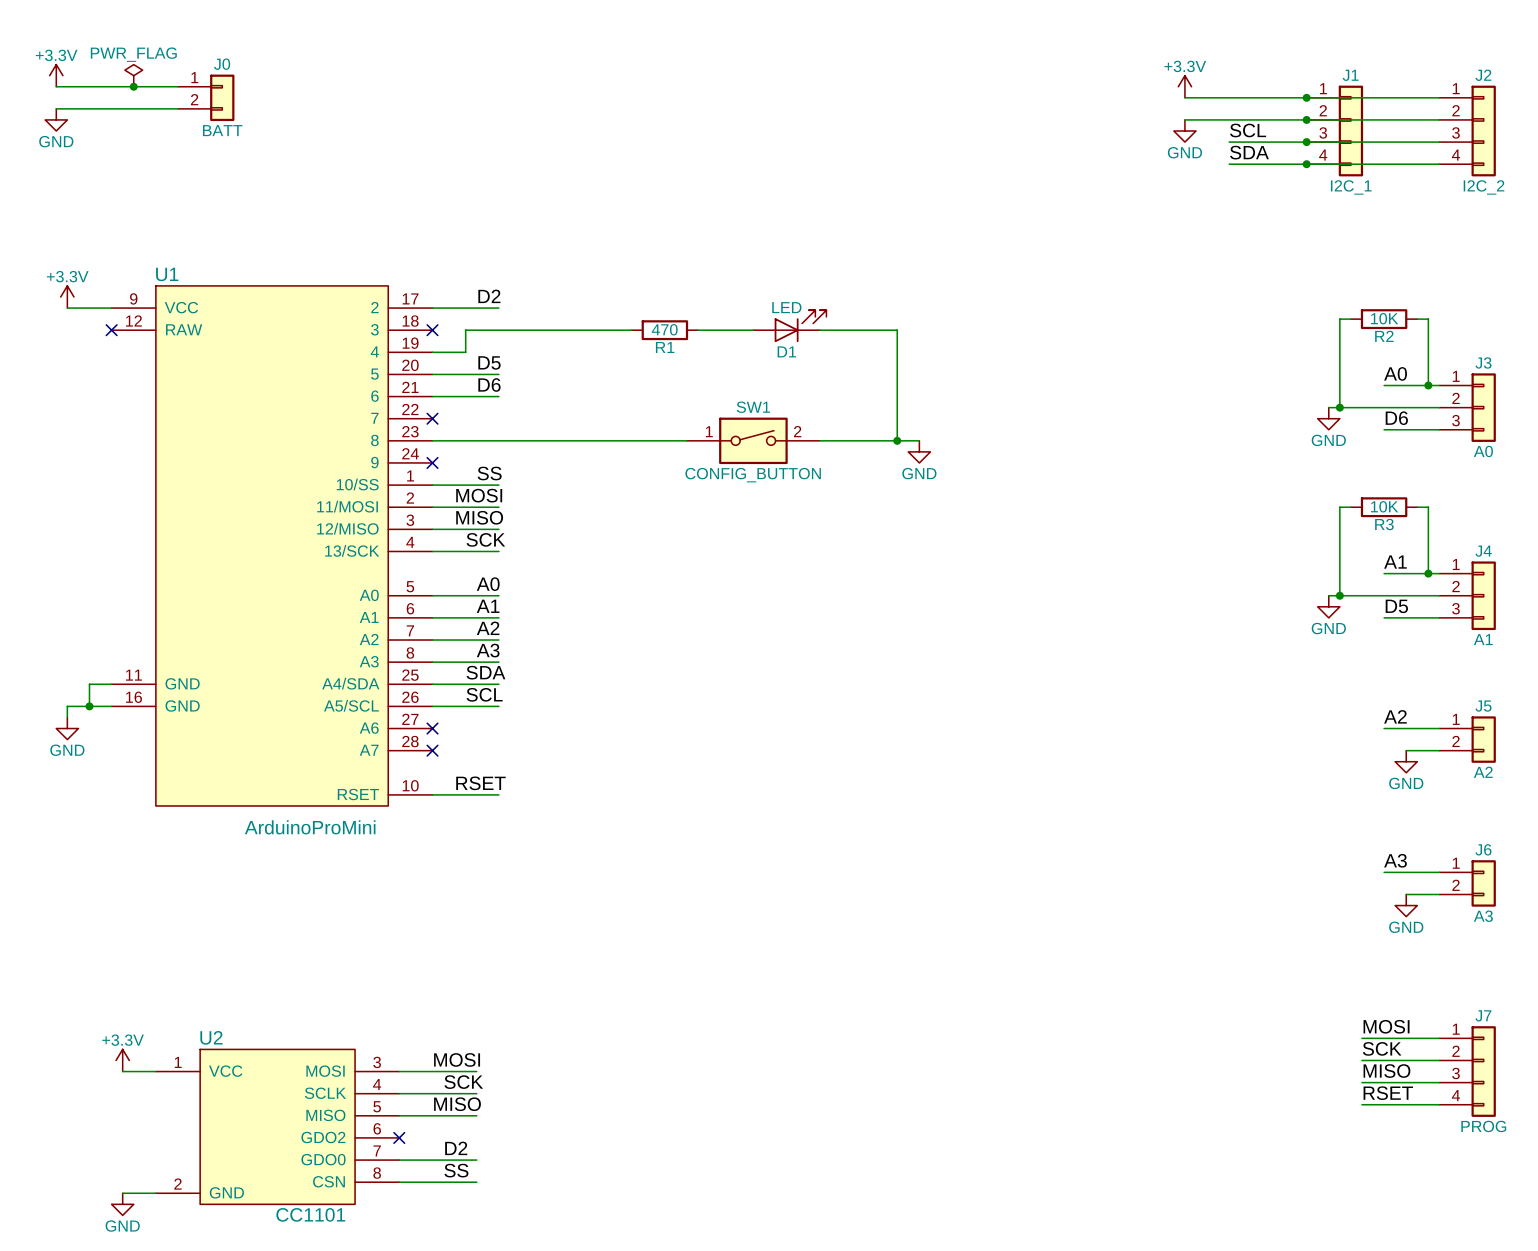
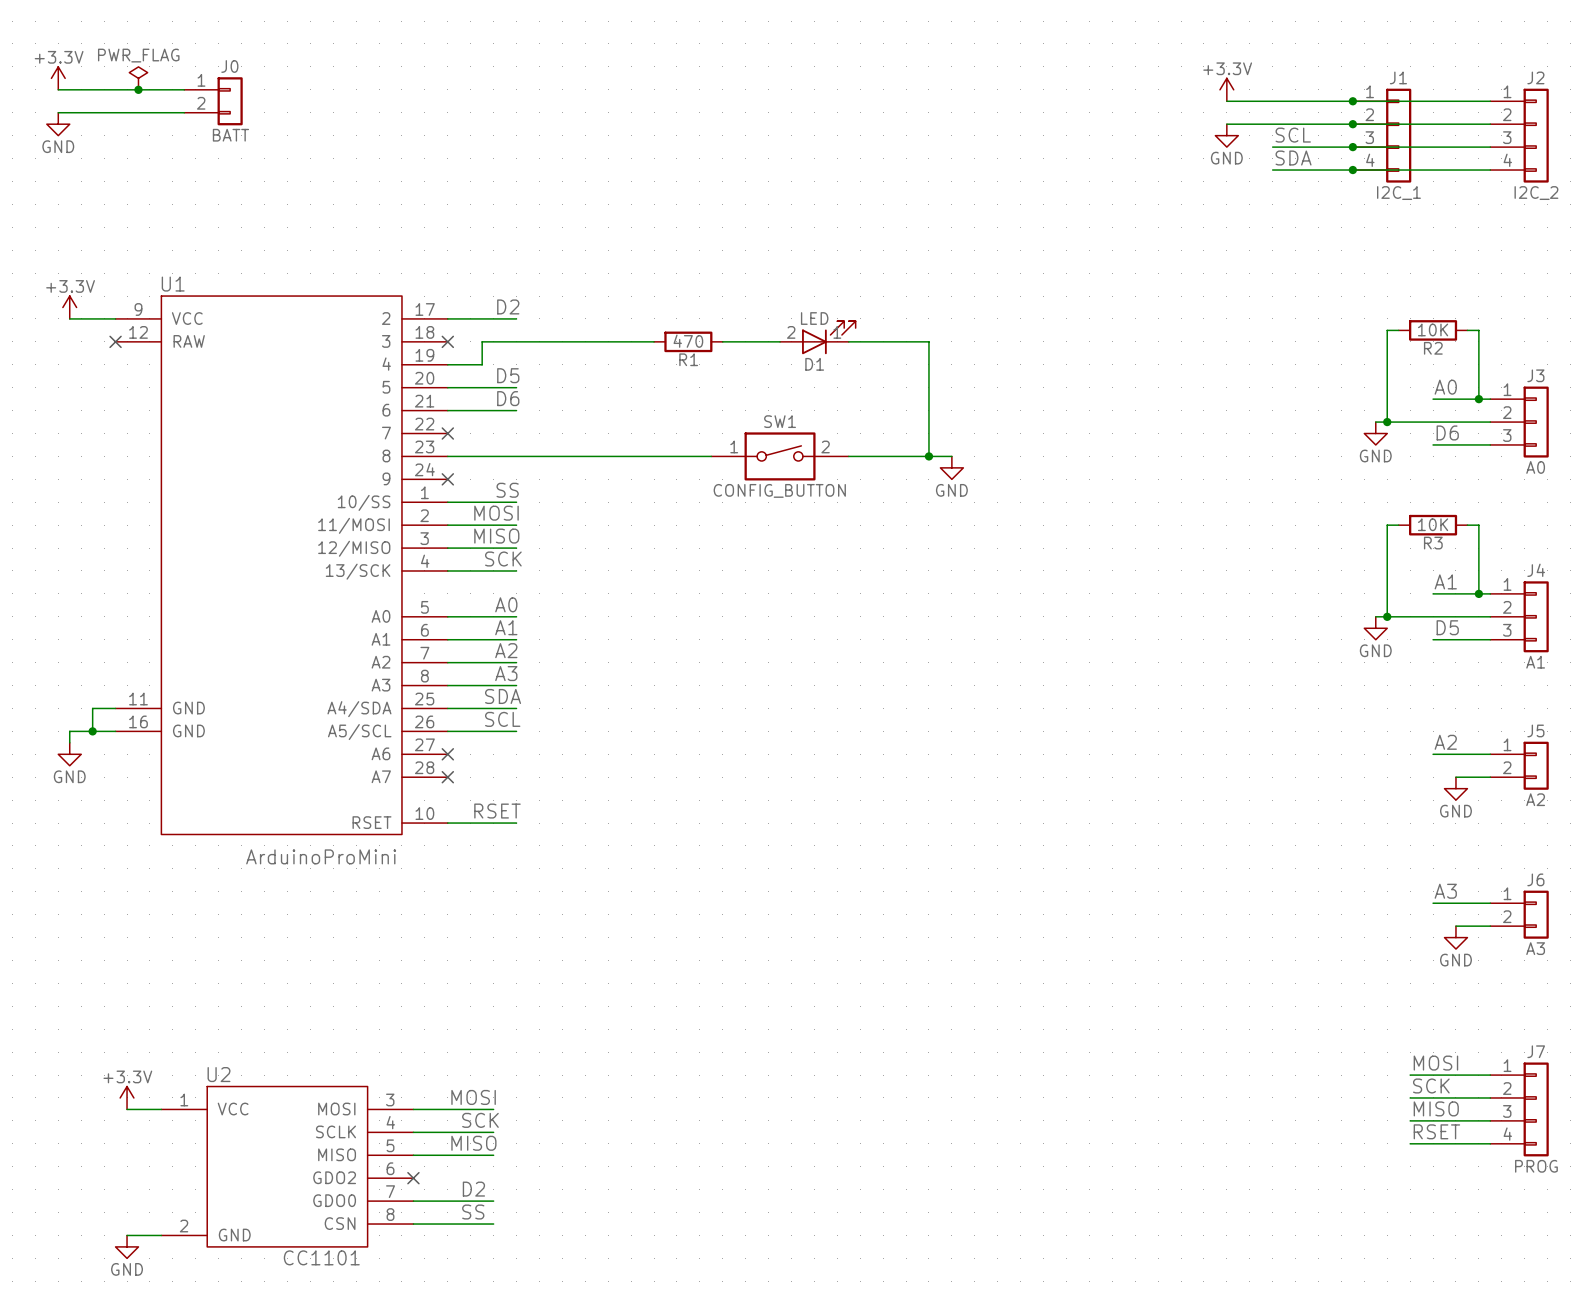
D1 pin number: none -> 2 (791, 332)
D1 pin number: none -> 1 (837, 332)

